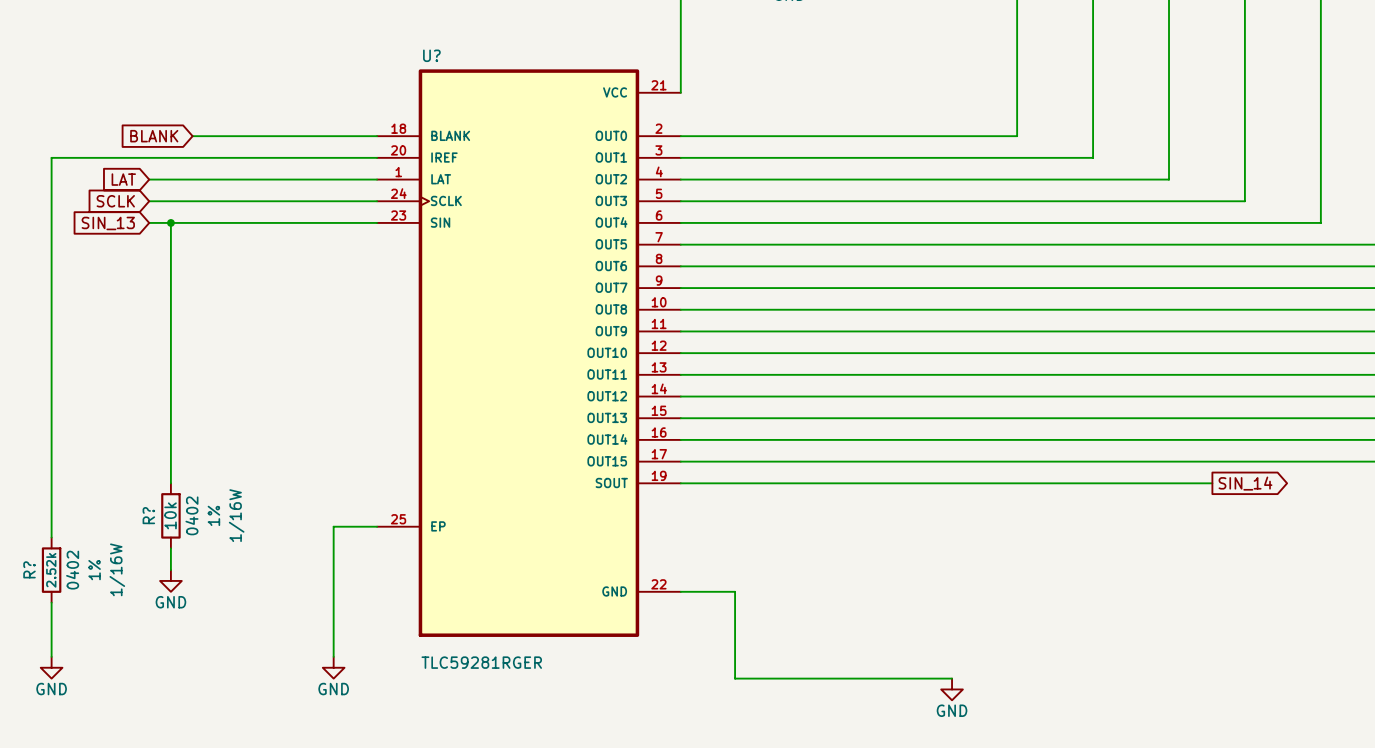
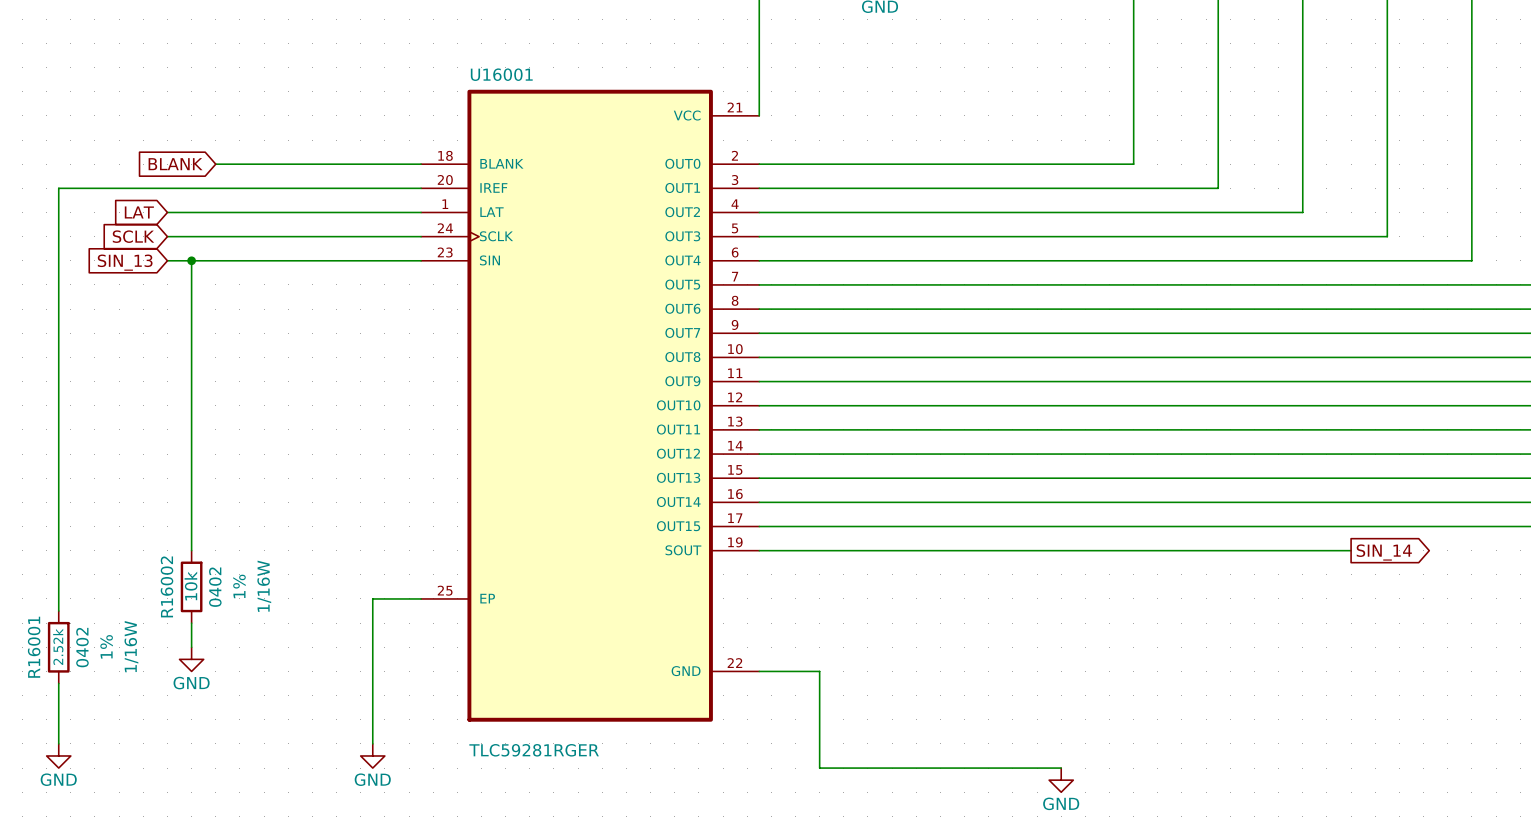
U? name: U? (431, 55) -> U16001 (501, 74)
R? name: R? (148, 515) -> R16002 (167, 586)
R? name: R? (29, 569) -> R16001 (34, 647)

